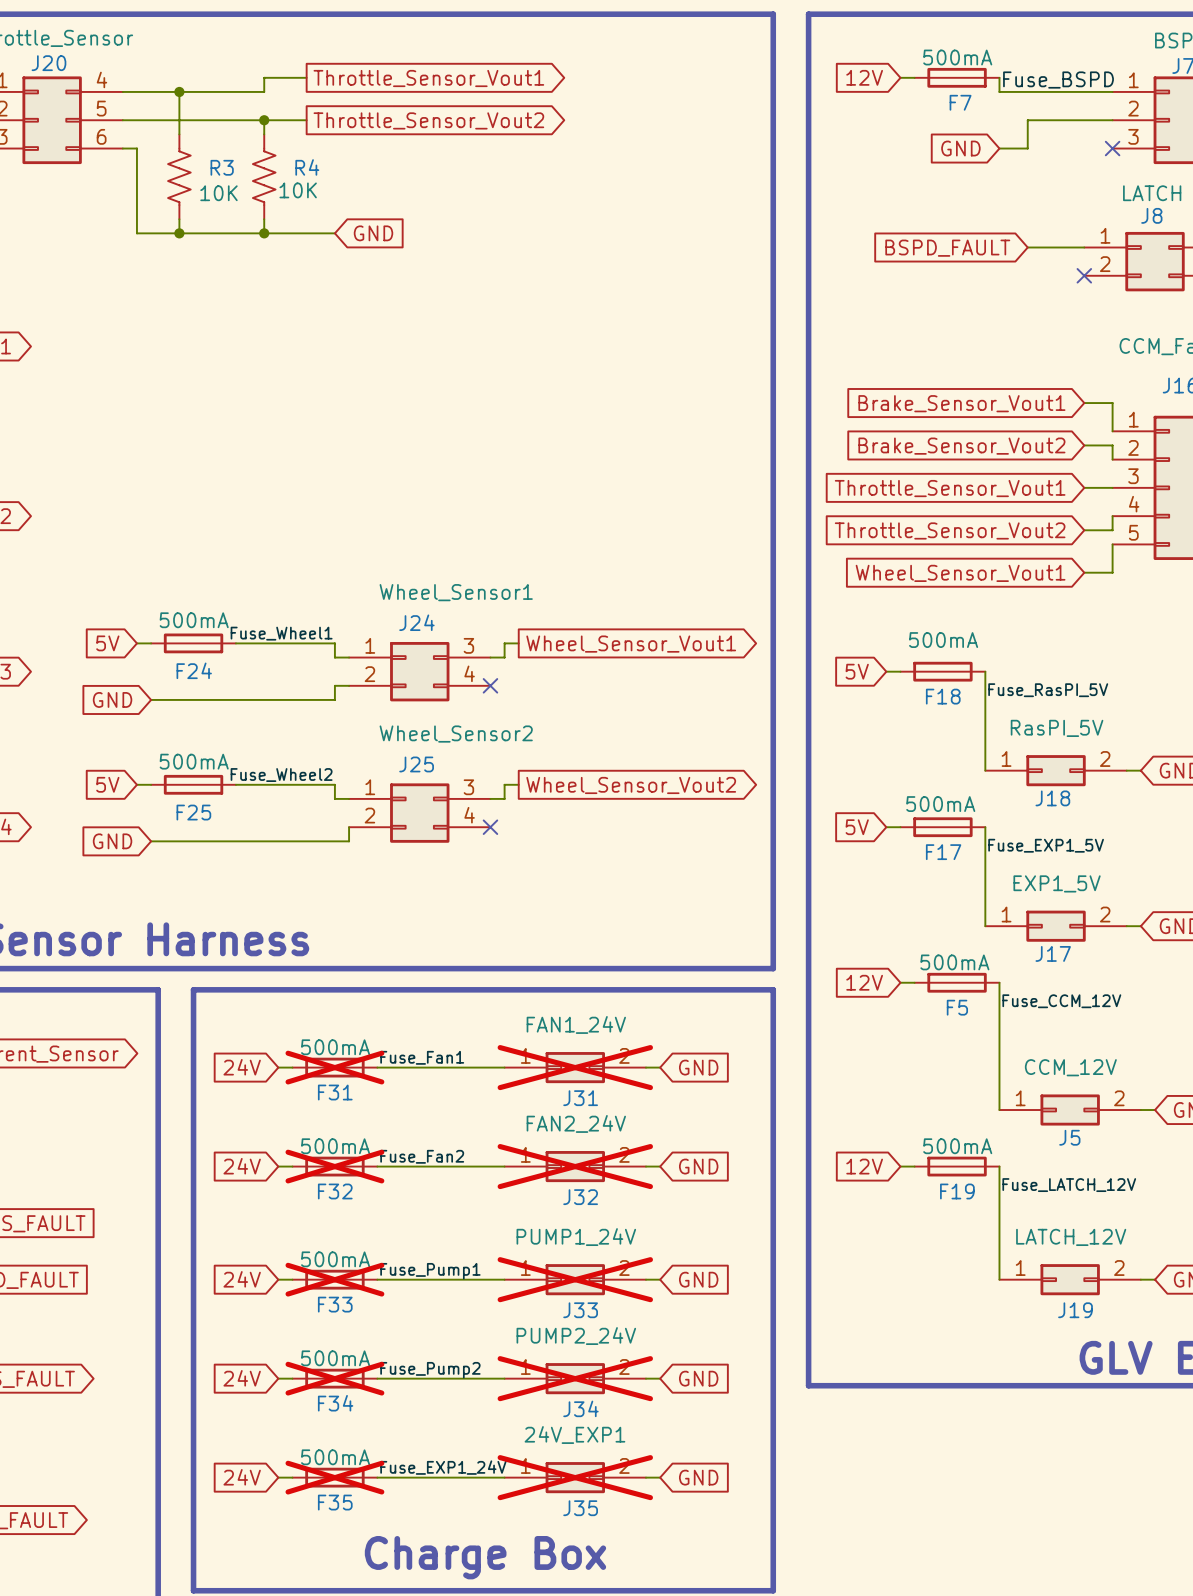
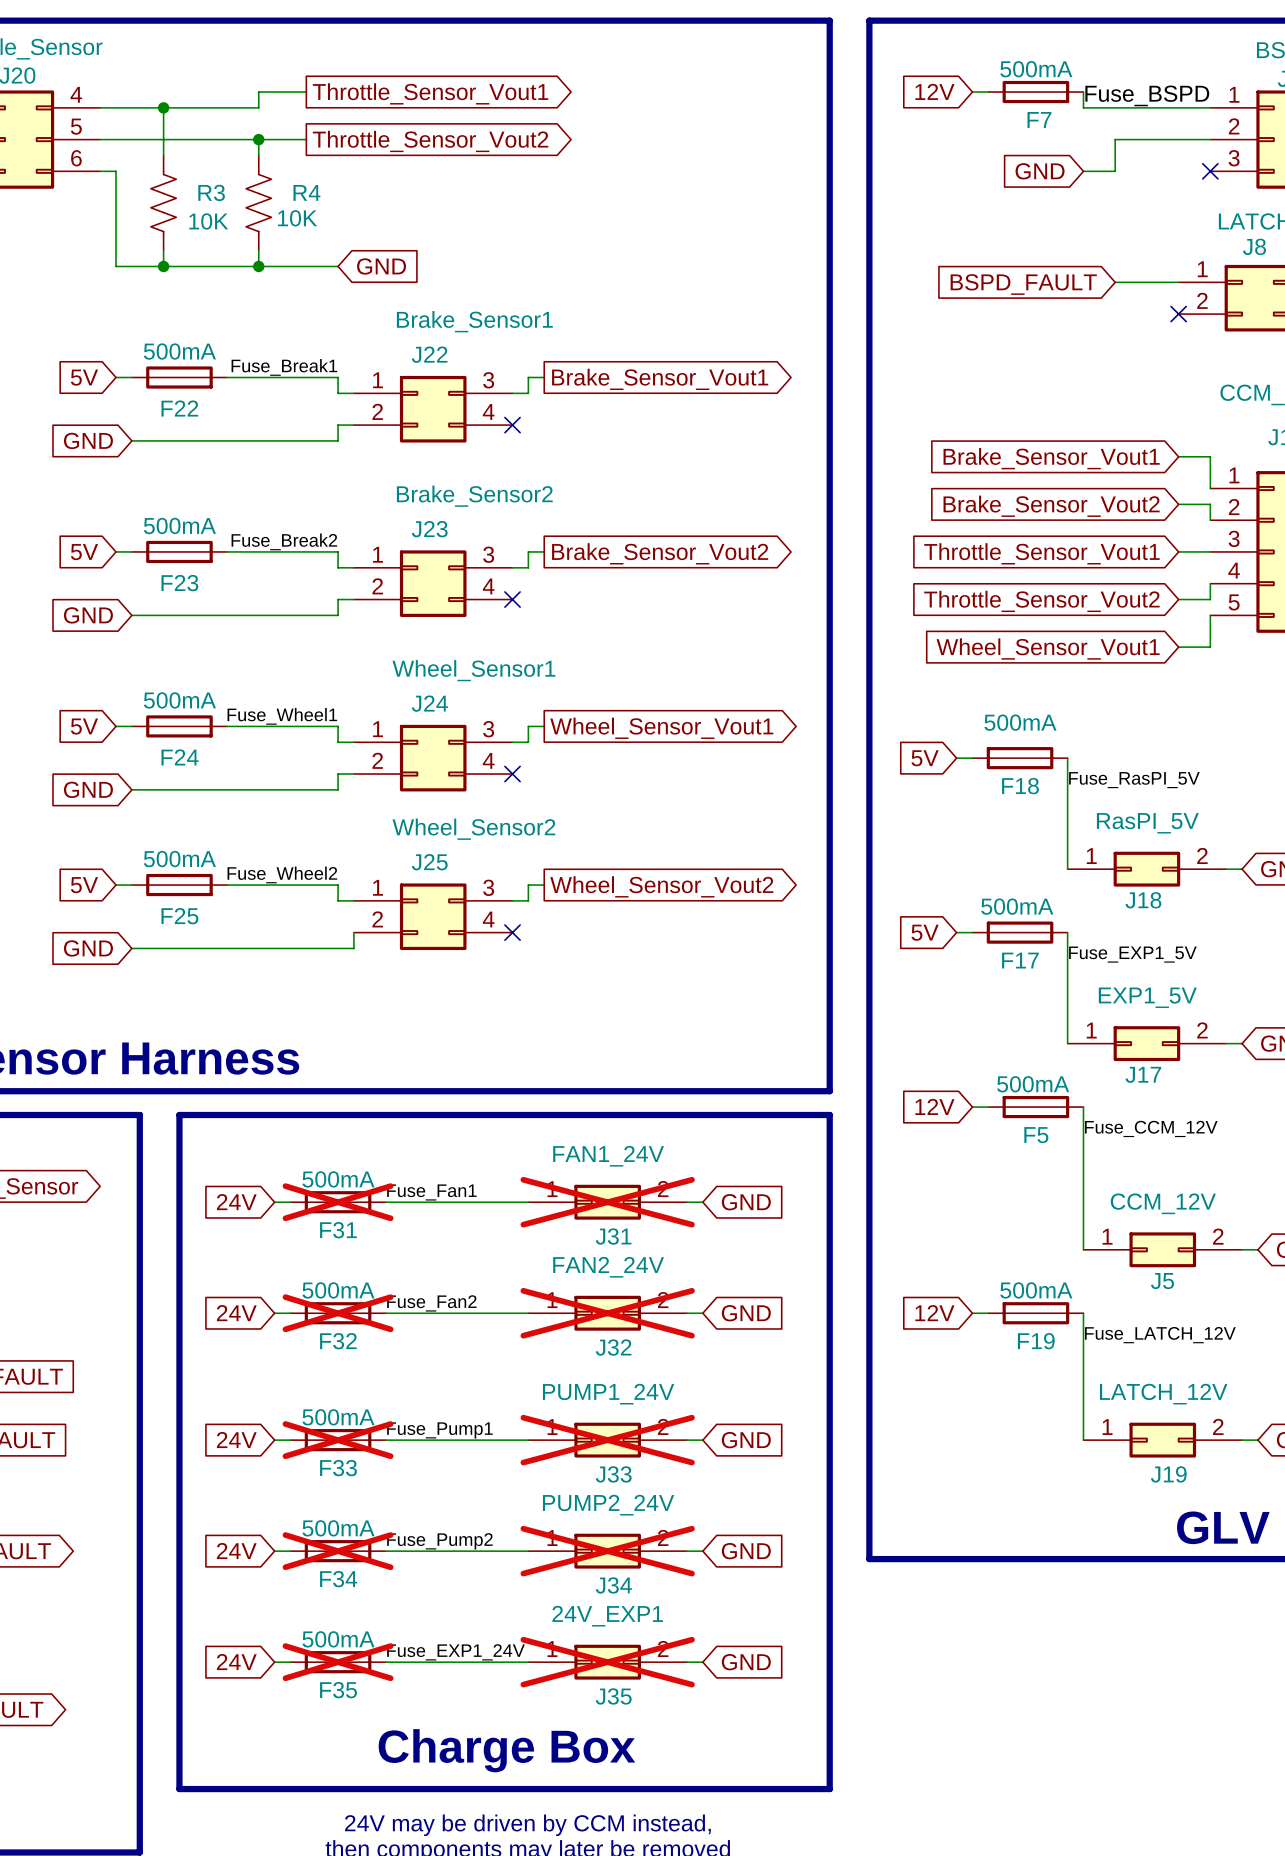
label: none -> Fuse_Break1 (284, 367)
global label: none -> 5V (84, 377)
wire: none -> (116, 377) (131, 377)
F22: none -> 500mA (179, 377)
wire: none -> (227, 377) (338, 377) (338, 393) (353, 393)
wire: none -> (544, 377) (528, 377) (528, 393) (512, 393)
global label: none -> Brake_Sensor_Vout1 (660, 379)
J22: none -> Brake_Sensor1 (433, 409)
wire: none -> (353, 425) (338, 425) (338, 440) (131, 440)
no-connect mark: none -> (512, 425)
global label: none -> GND (88, 440)
label: none -> Fuse_Break2 (284, 541)
global label: none -> 5V (84, 552)
wire: none -> (116, 551) (131, 551)
F23: none -> 500mA (179, 551)
wire: none -> (227, 551) (338, 551) (338, 567) (353, 567)
wire: none -> (544, 551) (528, 551) (528, 567) (512, 567)
global label: none -> Brake_Sensor_Vout2 (660, 553)
J23: none -> Brake_Sensor2 (433, 583)
wire: none -> (353, 599) (338, 599) (338, 615) (131, 615)
no-connect mark: none -> (512, 599)
global label: none -> GND (88, 615)

